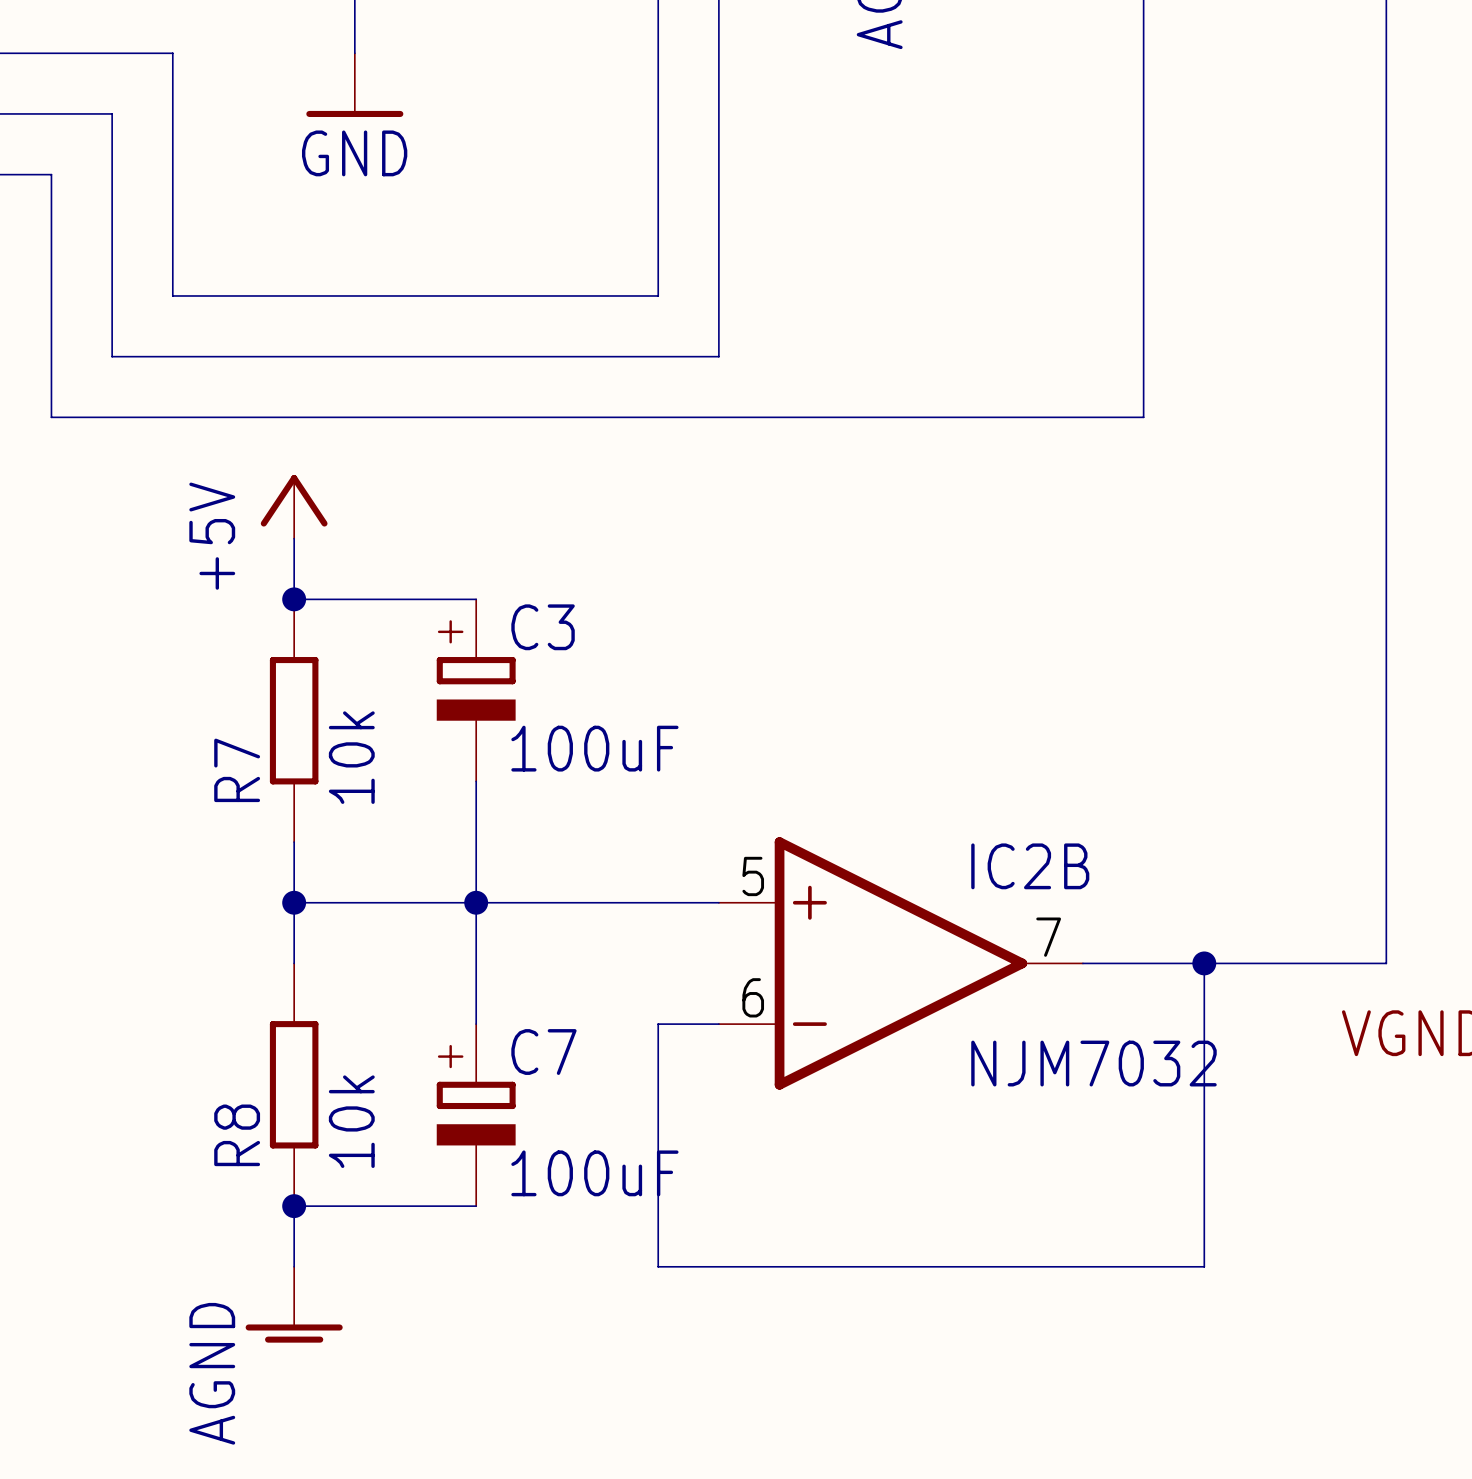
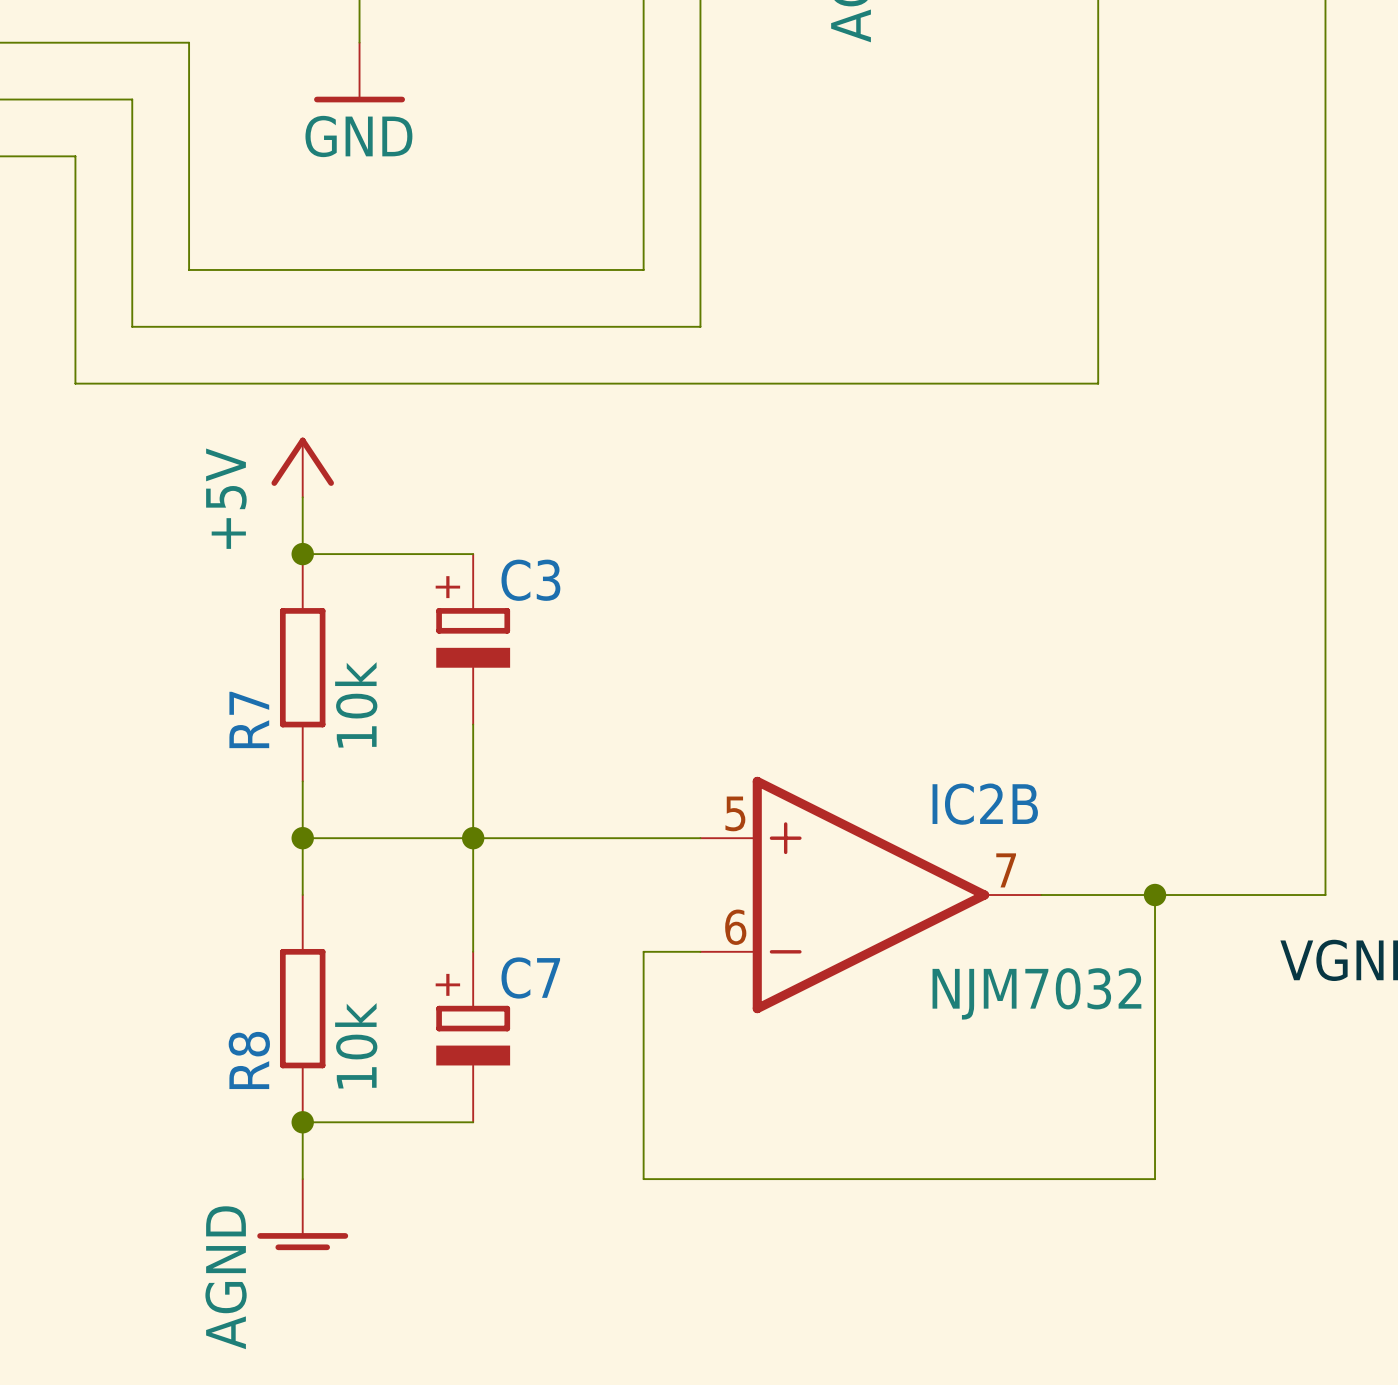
C3 value: 100uF (594, 748) -> none
C7 value: 100uF (594, 1173) -> none

